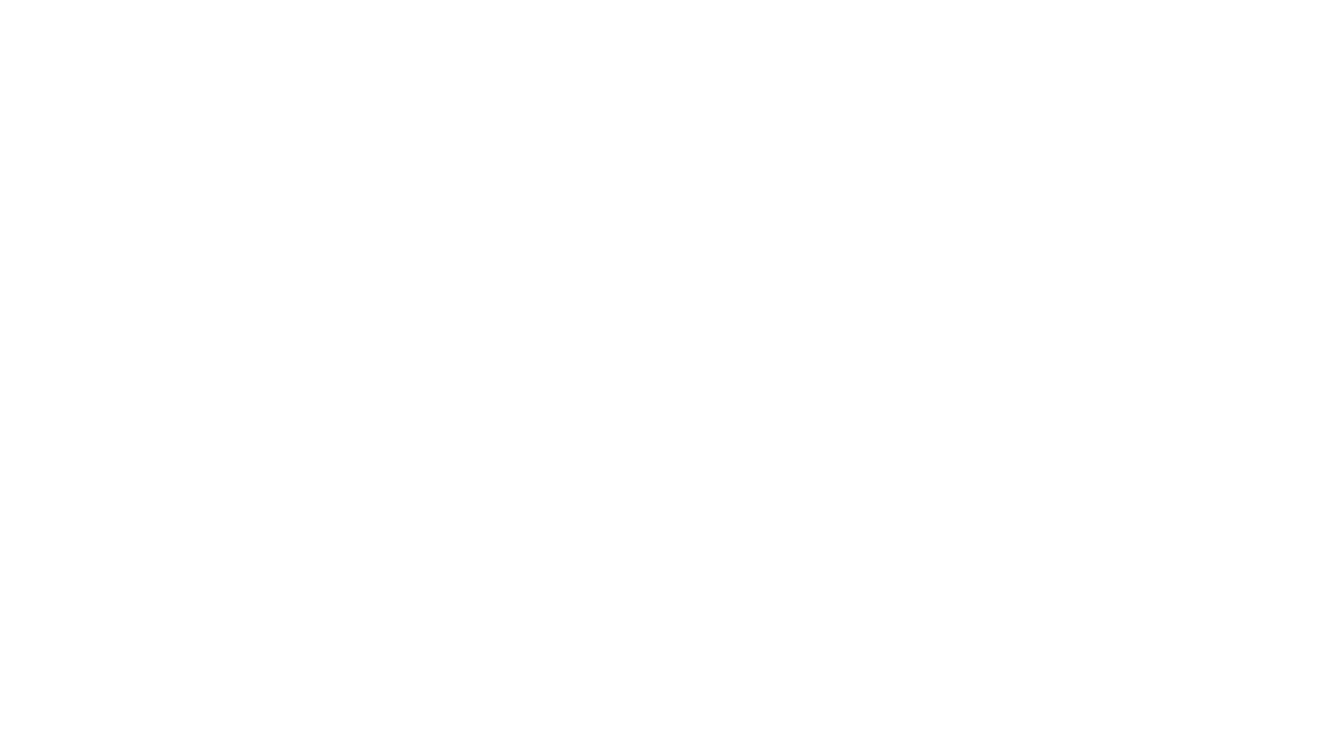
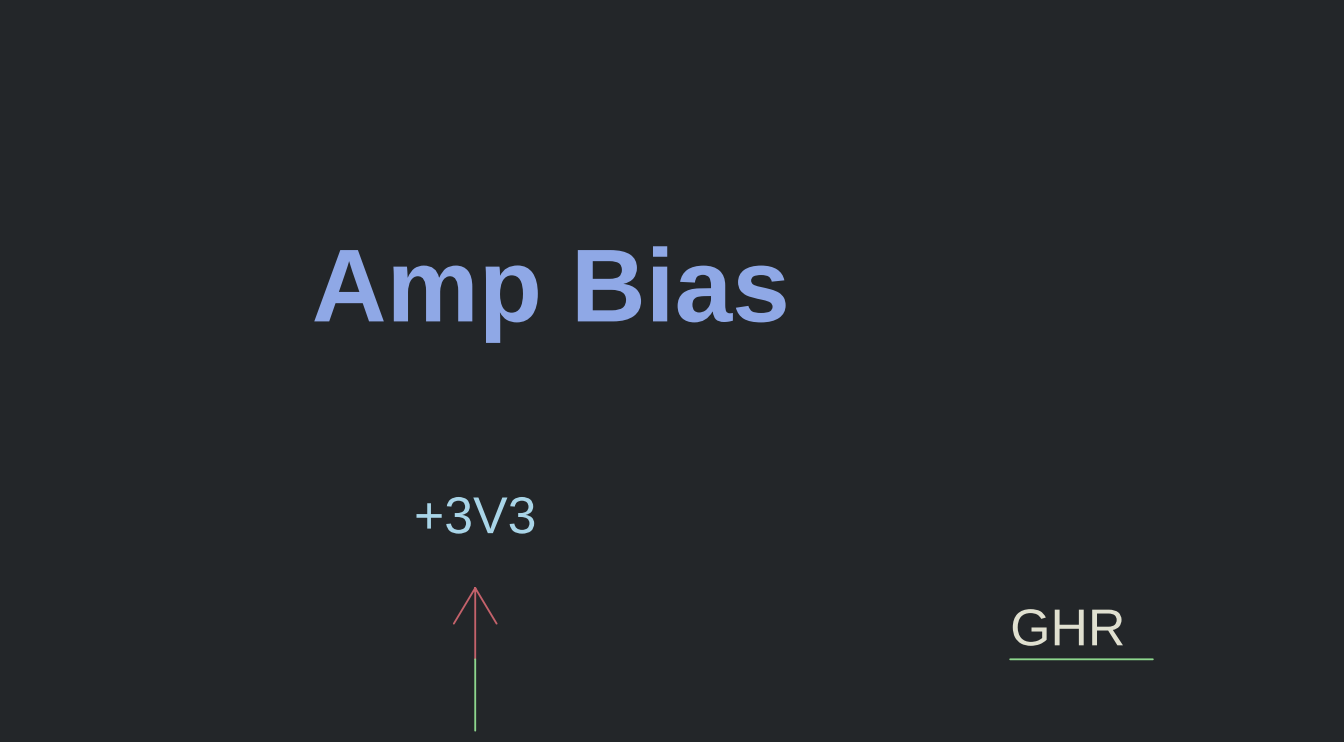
text: none -> Amp Bias (549, 294)
power symbol: none -> +3V3 (475, 623)
label: none -> GHR (1067, 627)
wire: none -> (475, 659) (475, 730)
wire: none -> (1010, 659) (1152, 659)

